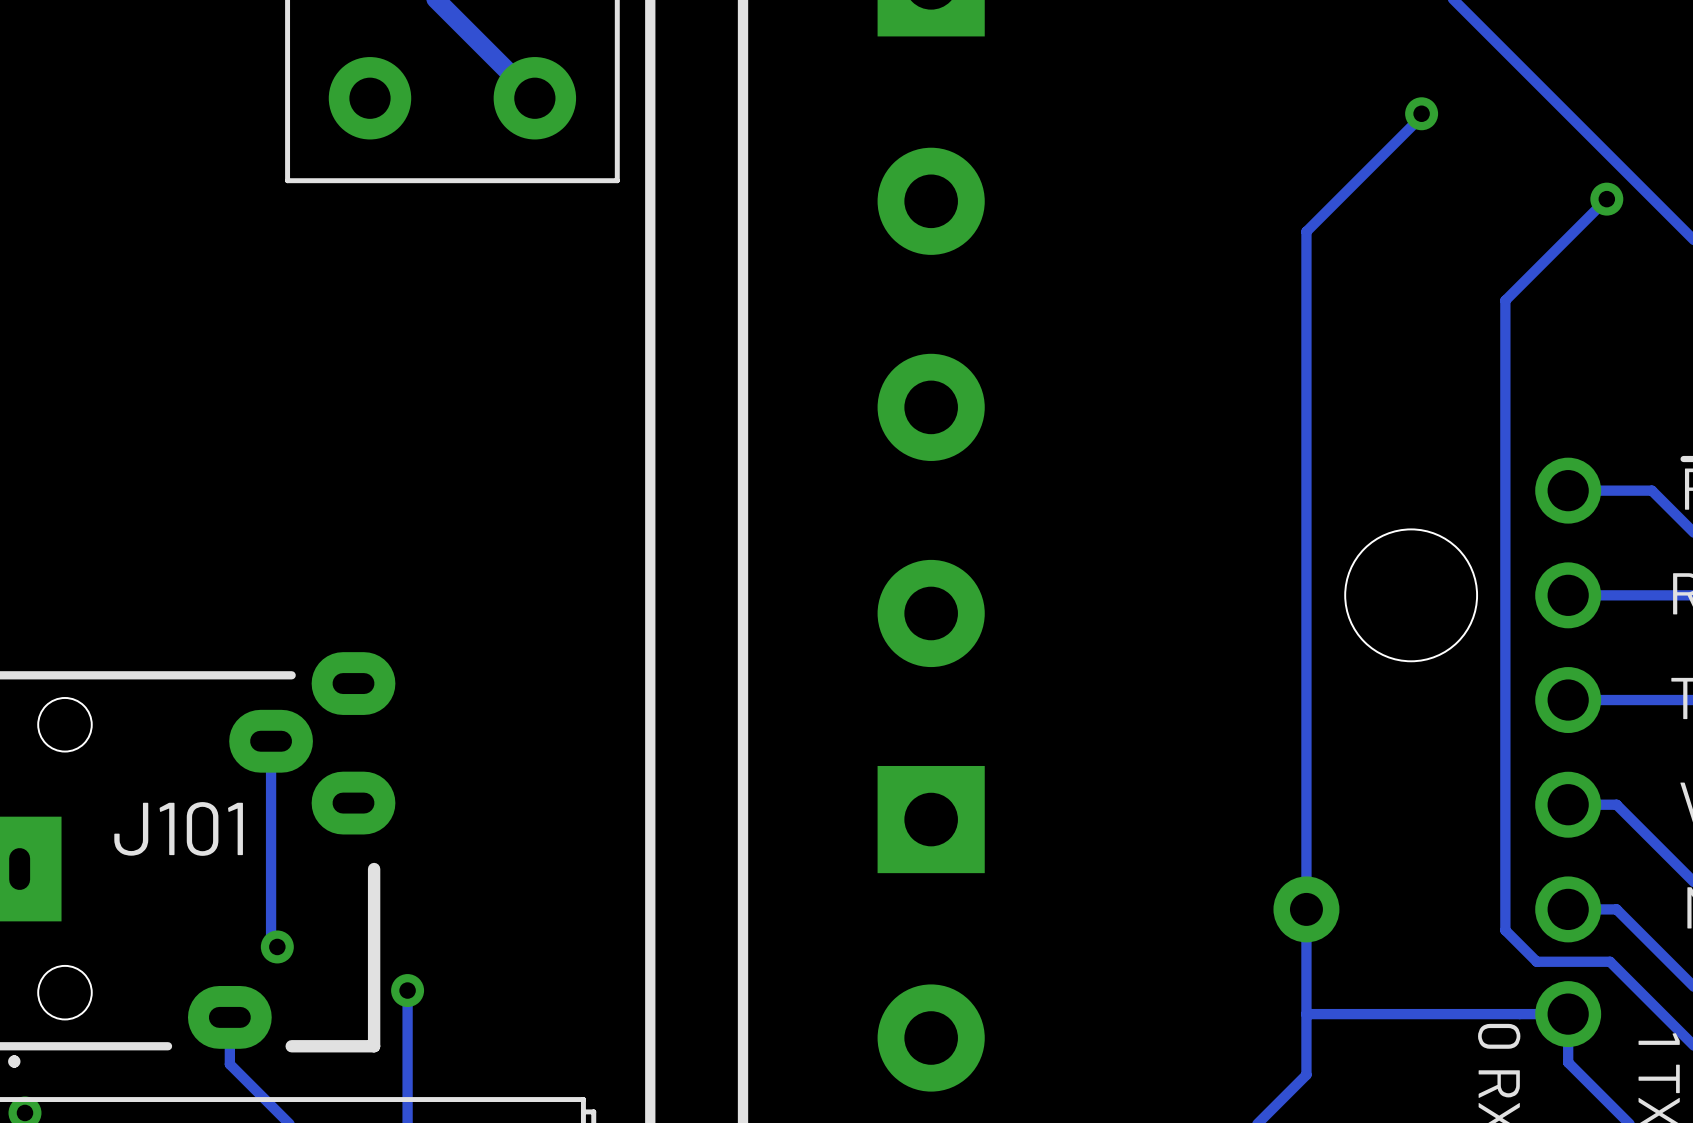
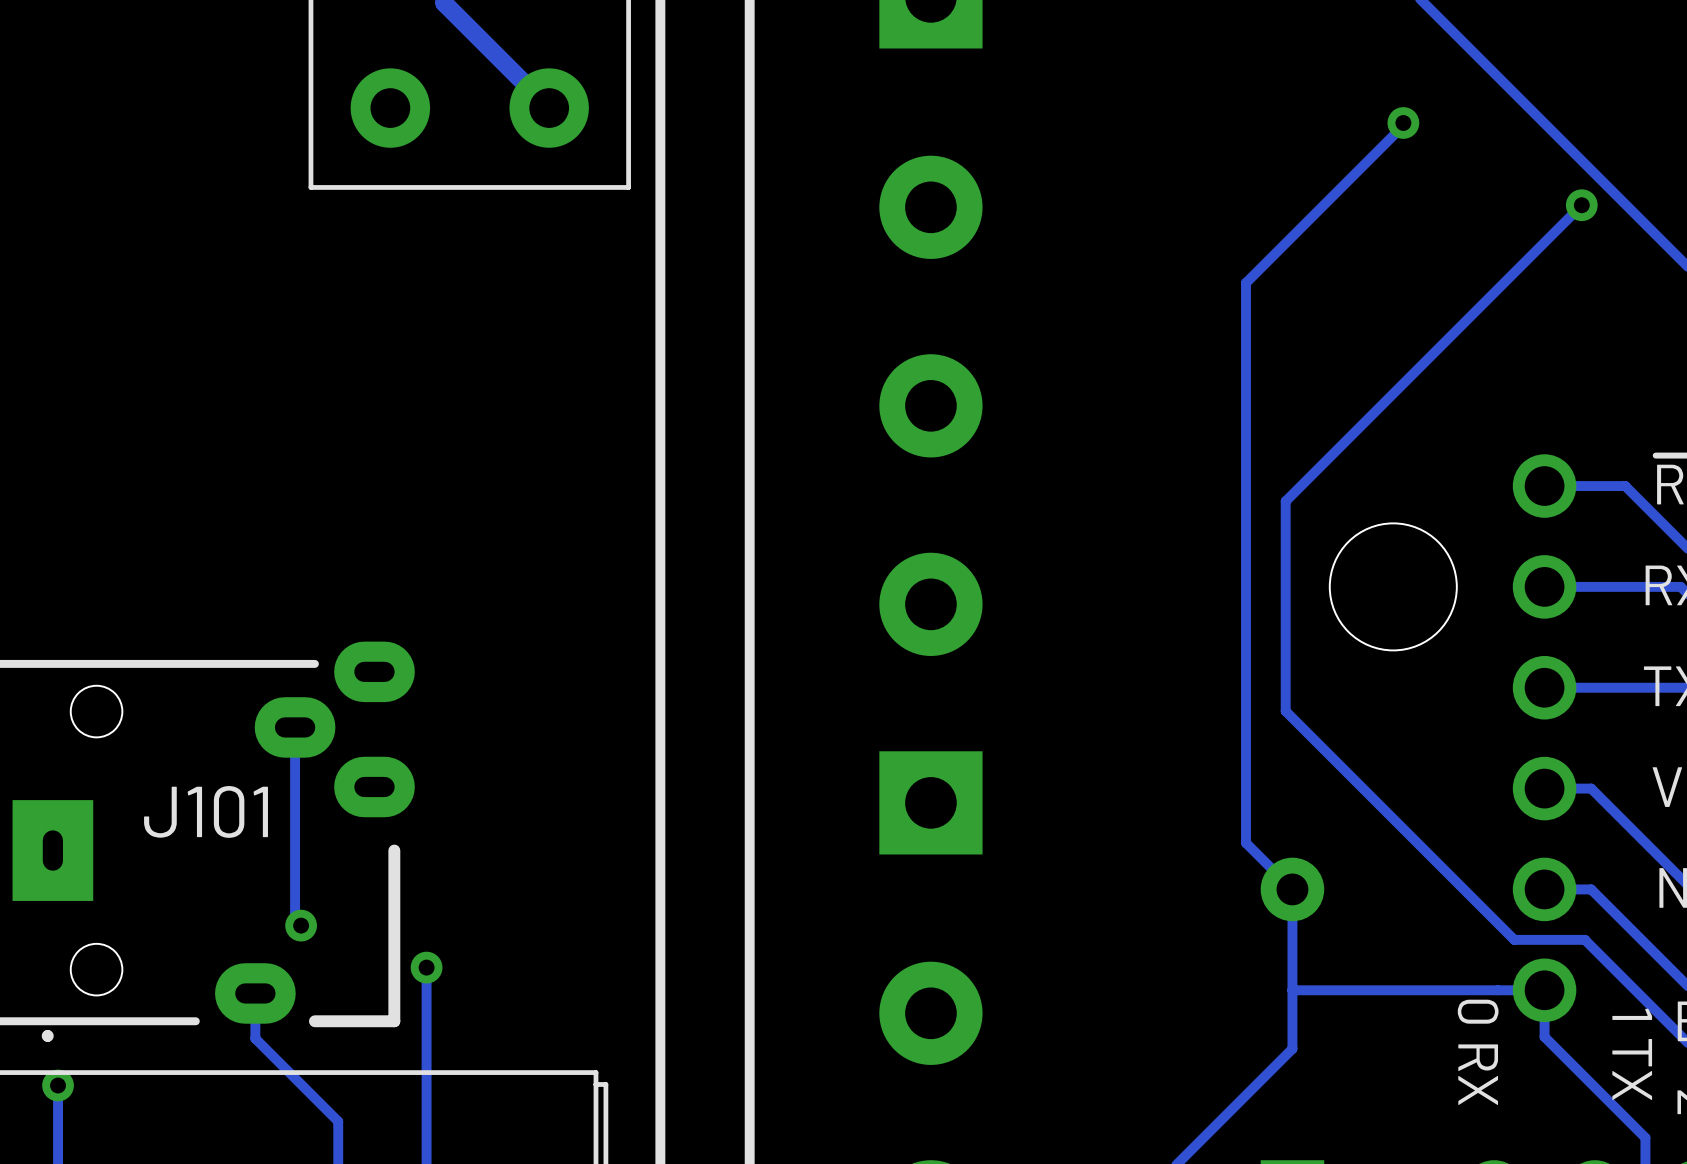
track: (1306, 231) (1306, 909) -> (1292, 236) (1246, 283) (1246, 842) (1292, 889)
track: (1505, 300) (1505, 930) -> (1484, 302) (1285, 501) (1285, 711) (1484, 909)

